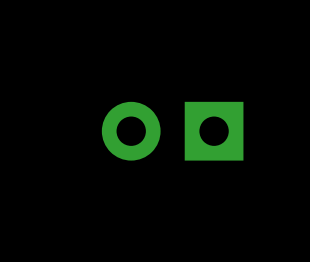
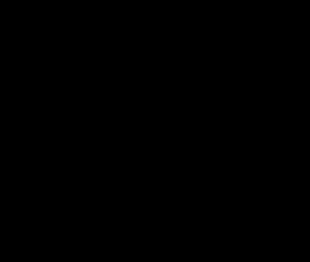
part: (172, 131) -> none

